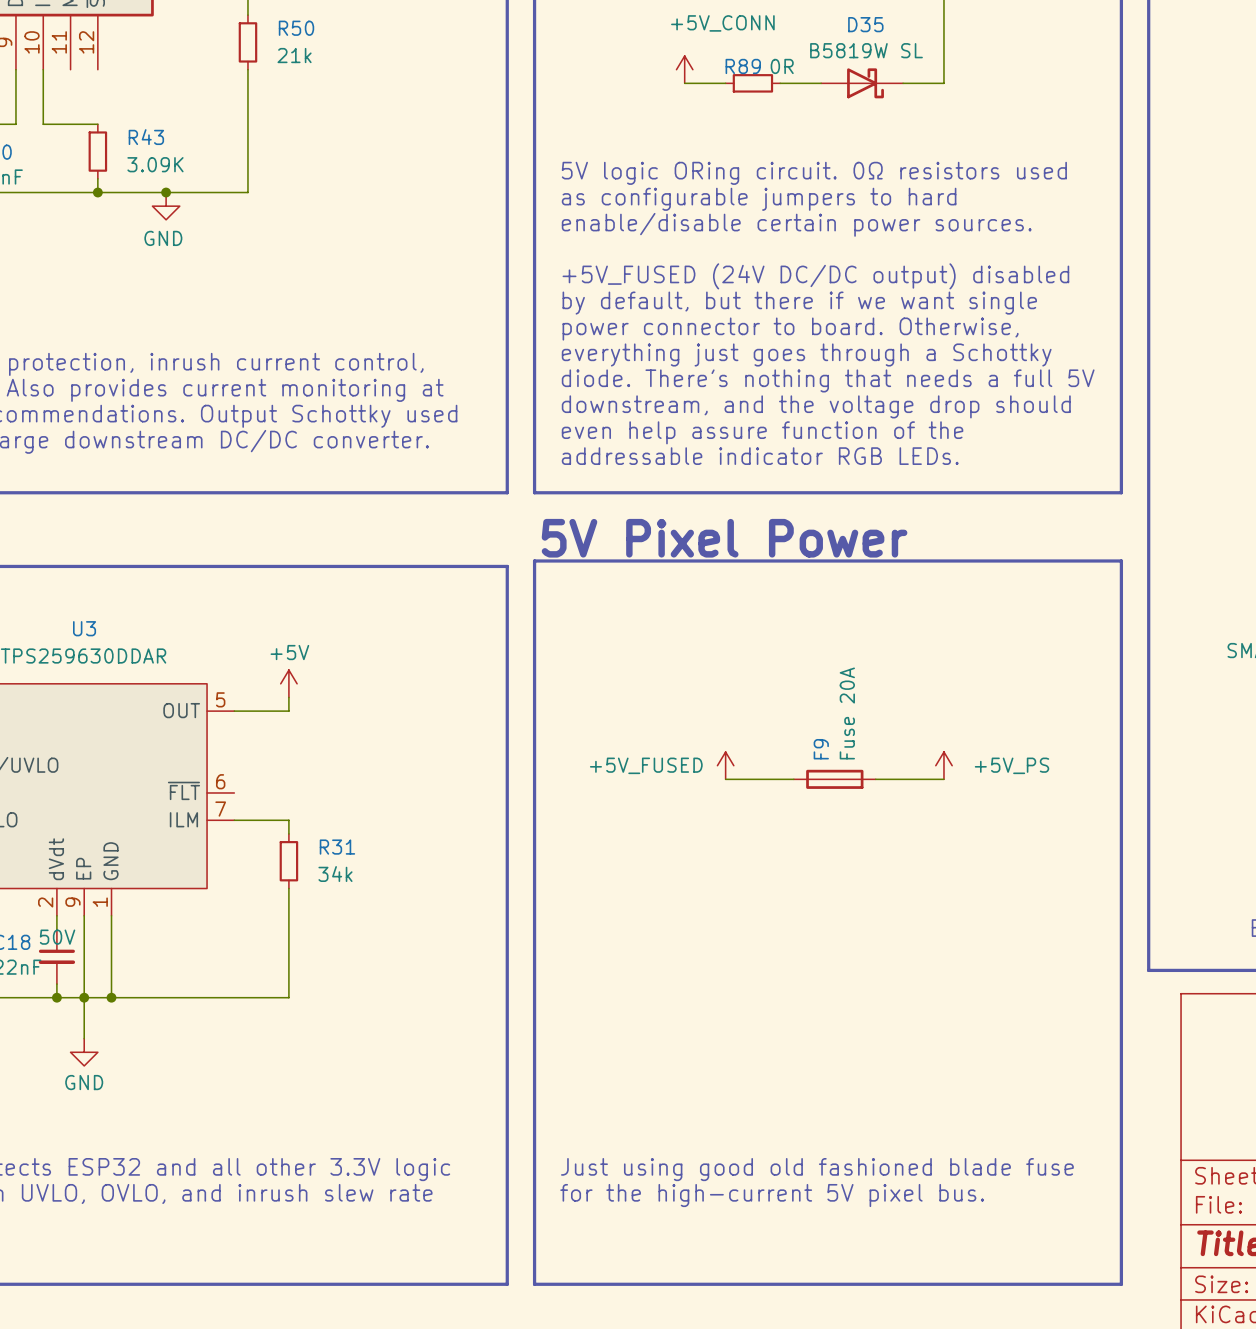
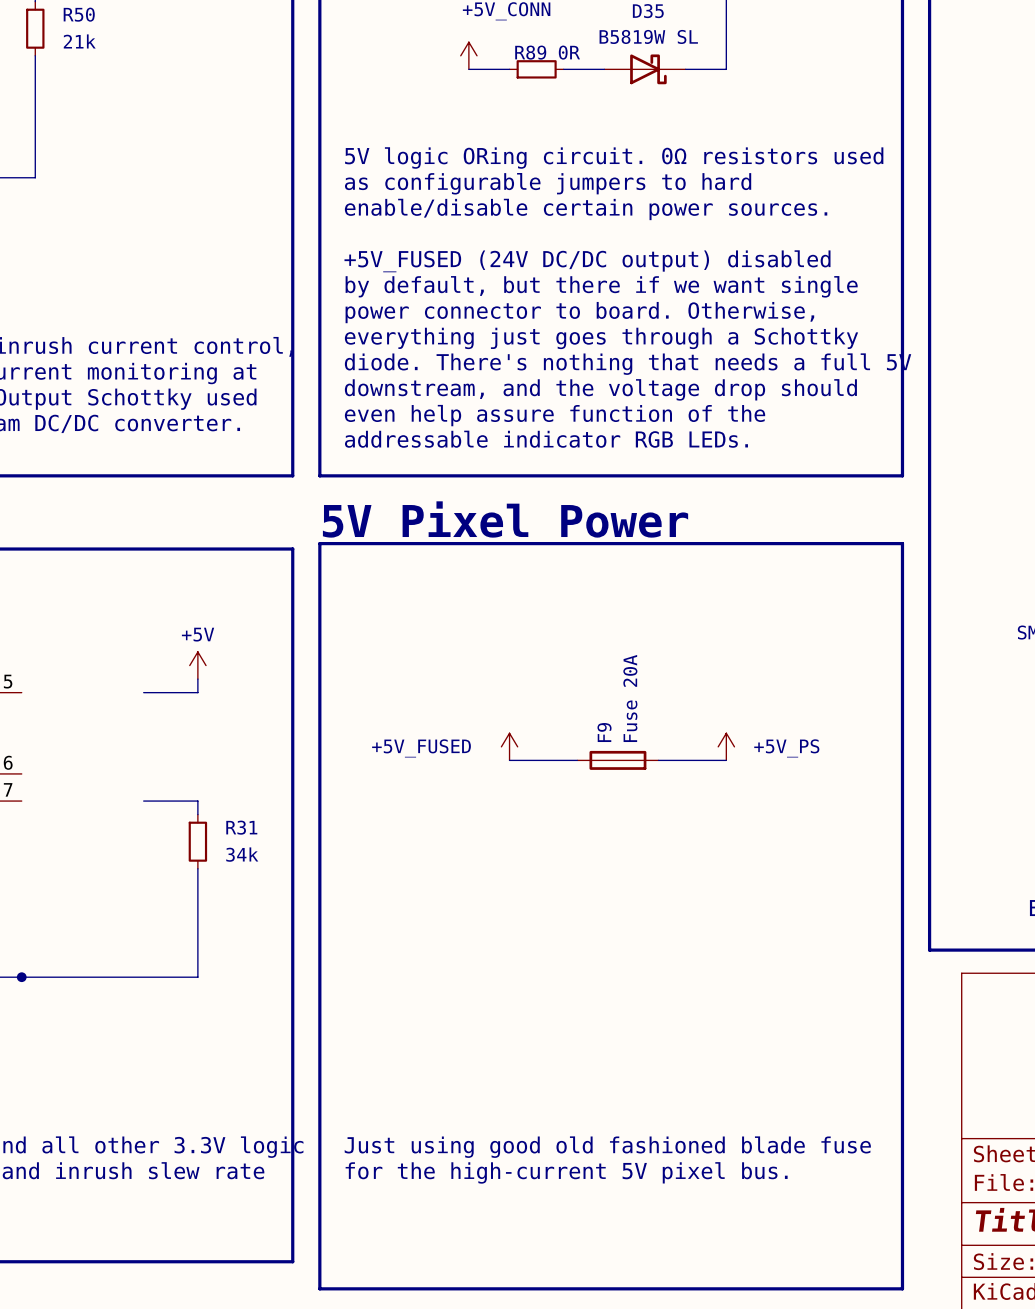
power symbol position: +5V (288, 683) -> +5V (197, 665)
wire: (288, 697) (288, 711) (234, 711) -> (197, 679) (197, 692) (143, 692)
wire: (234, 820) (288, 820) (288, 833) -> (143, 801) (197, 801) (197, 814)
R31 position: (288, 861) -> (197, 841)
wire: (288, 888) (288, 997) -> (197, 868) (197, 977) (75, 977)
junction: none -> (21, 977)
line: (534, 1284) (1121, 1284) -> (319, 1261) (319, 1288) (902, 1288) (902, 1261)

